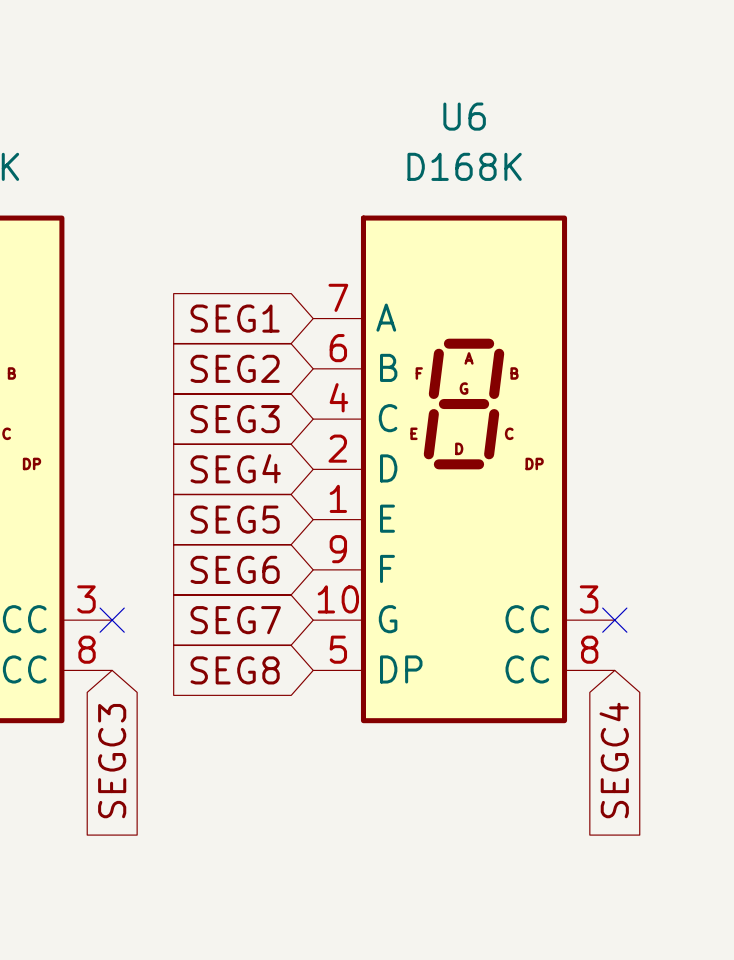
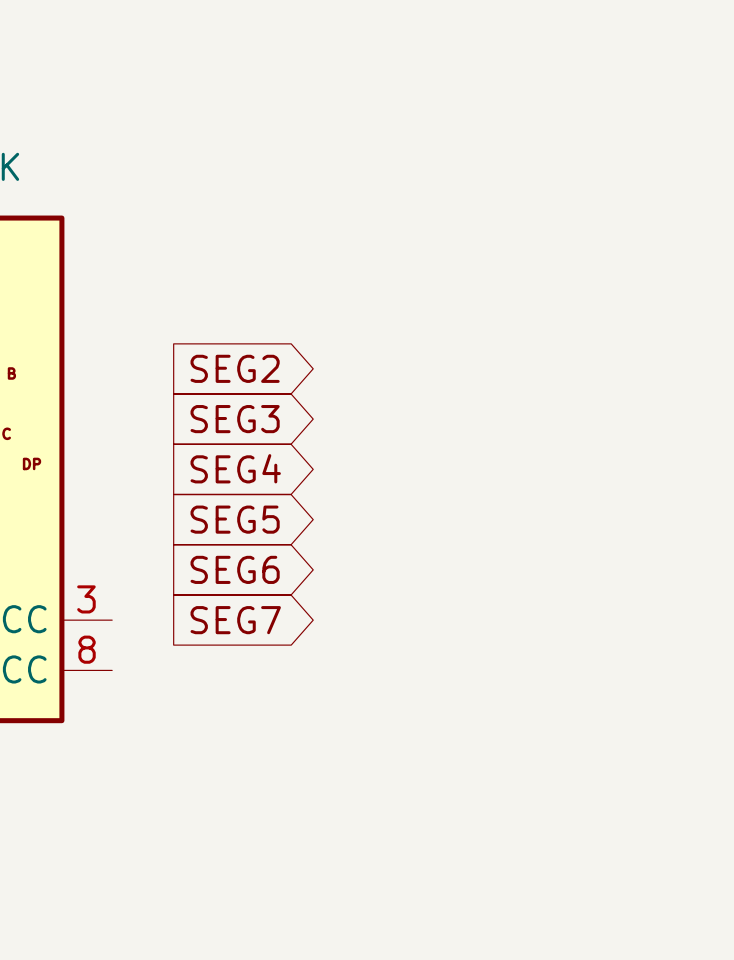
global label: SEG1 (235, 318) -> none
U6: D168K (464, 469) -> none
no-connect mark: (112, 620) -> none
no-connect mark: (614, 620) -> none
global label: SEG8 (235, 670) -> none
global label: SEGC4 (614, 760) -> none
global label: SEGC3 (112, 761) -> none

